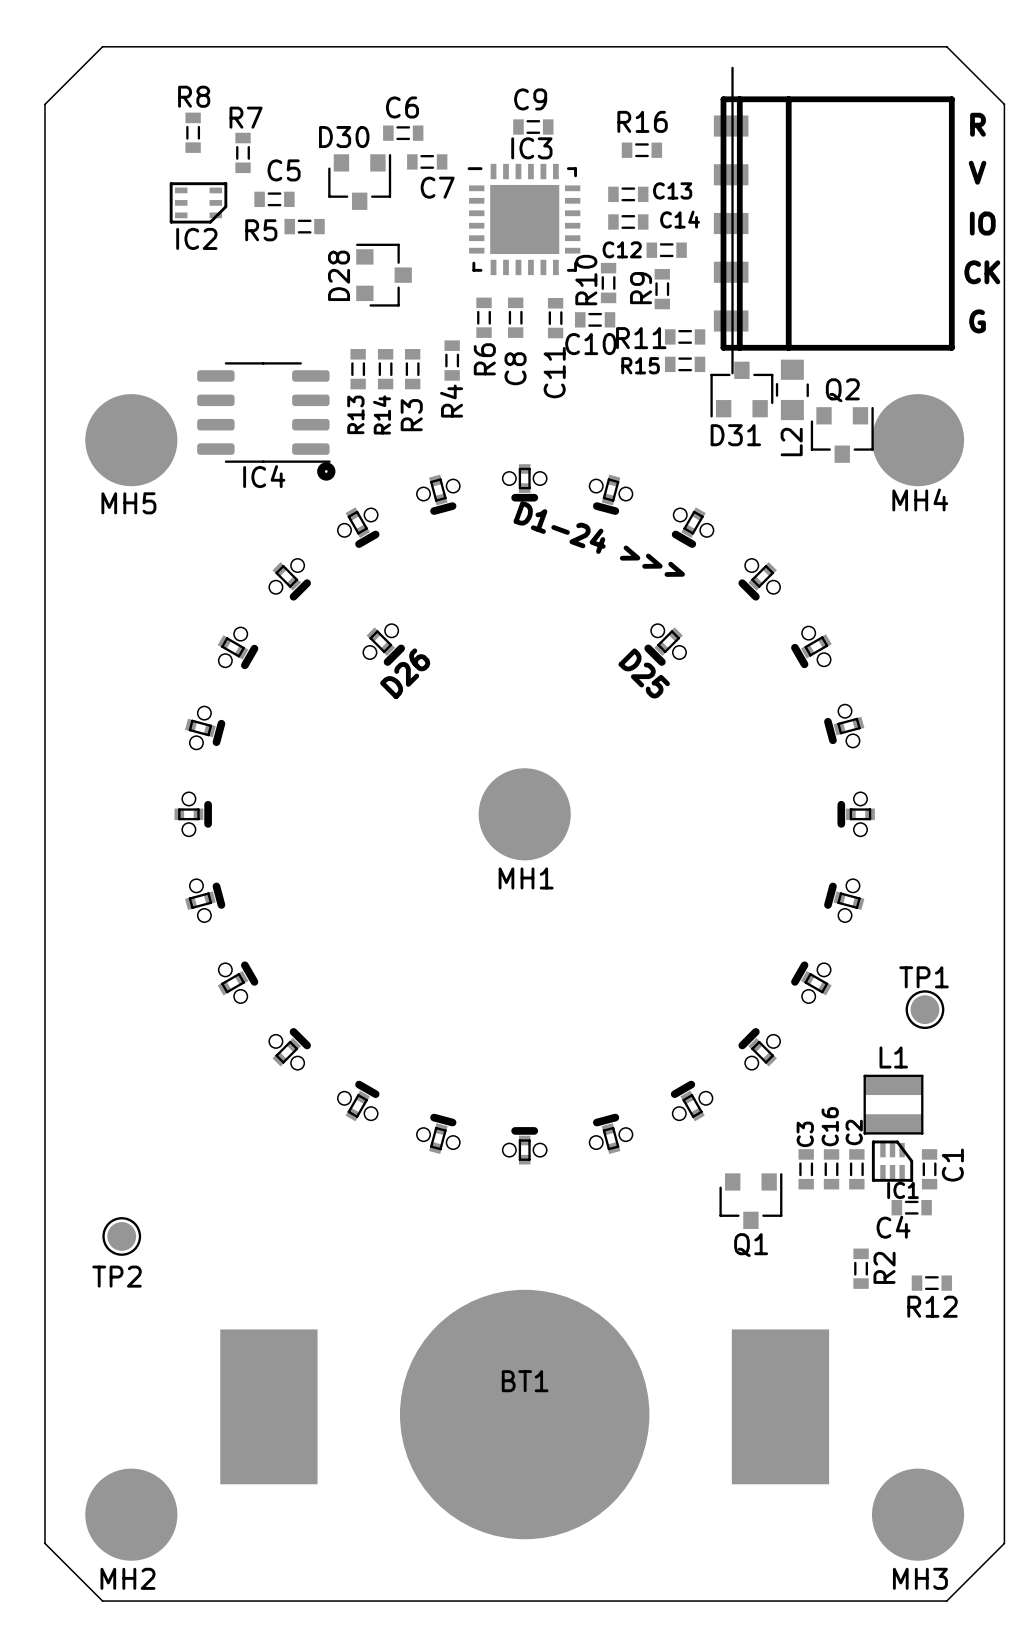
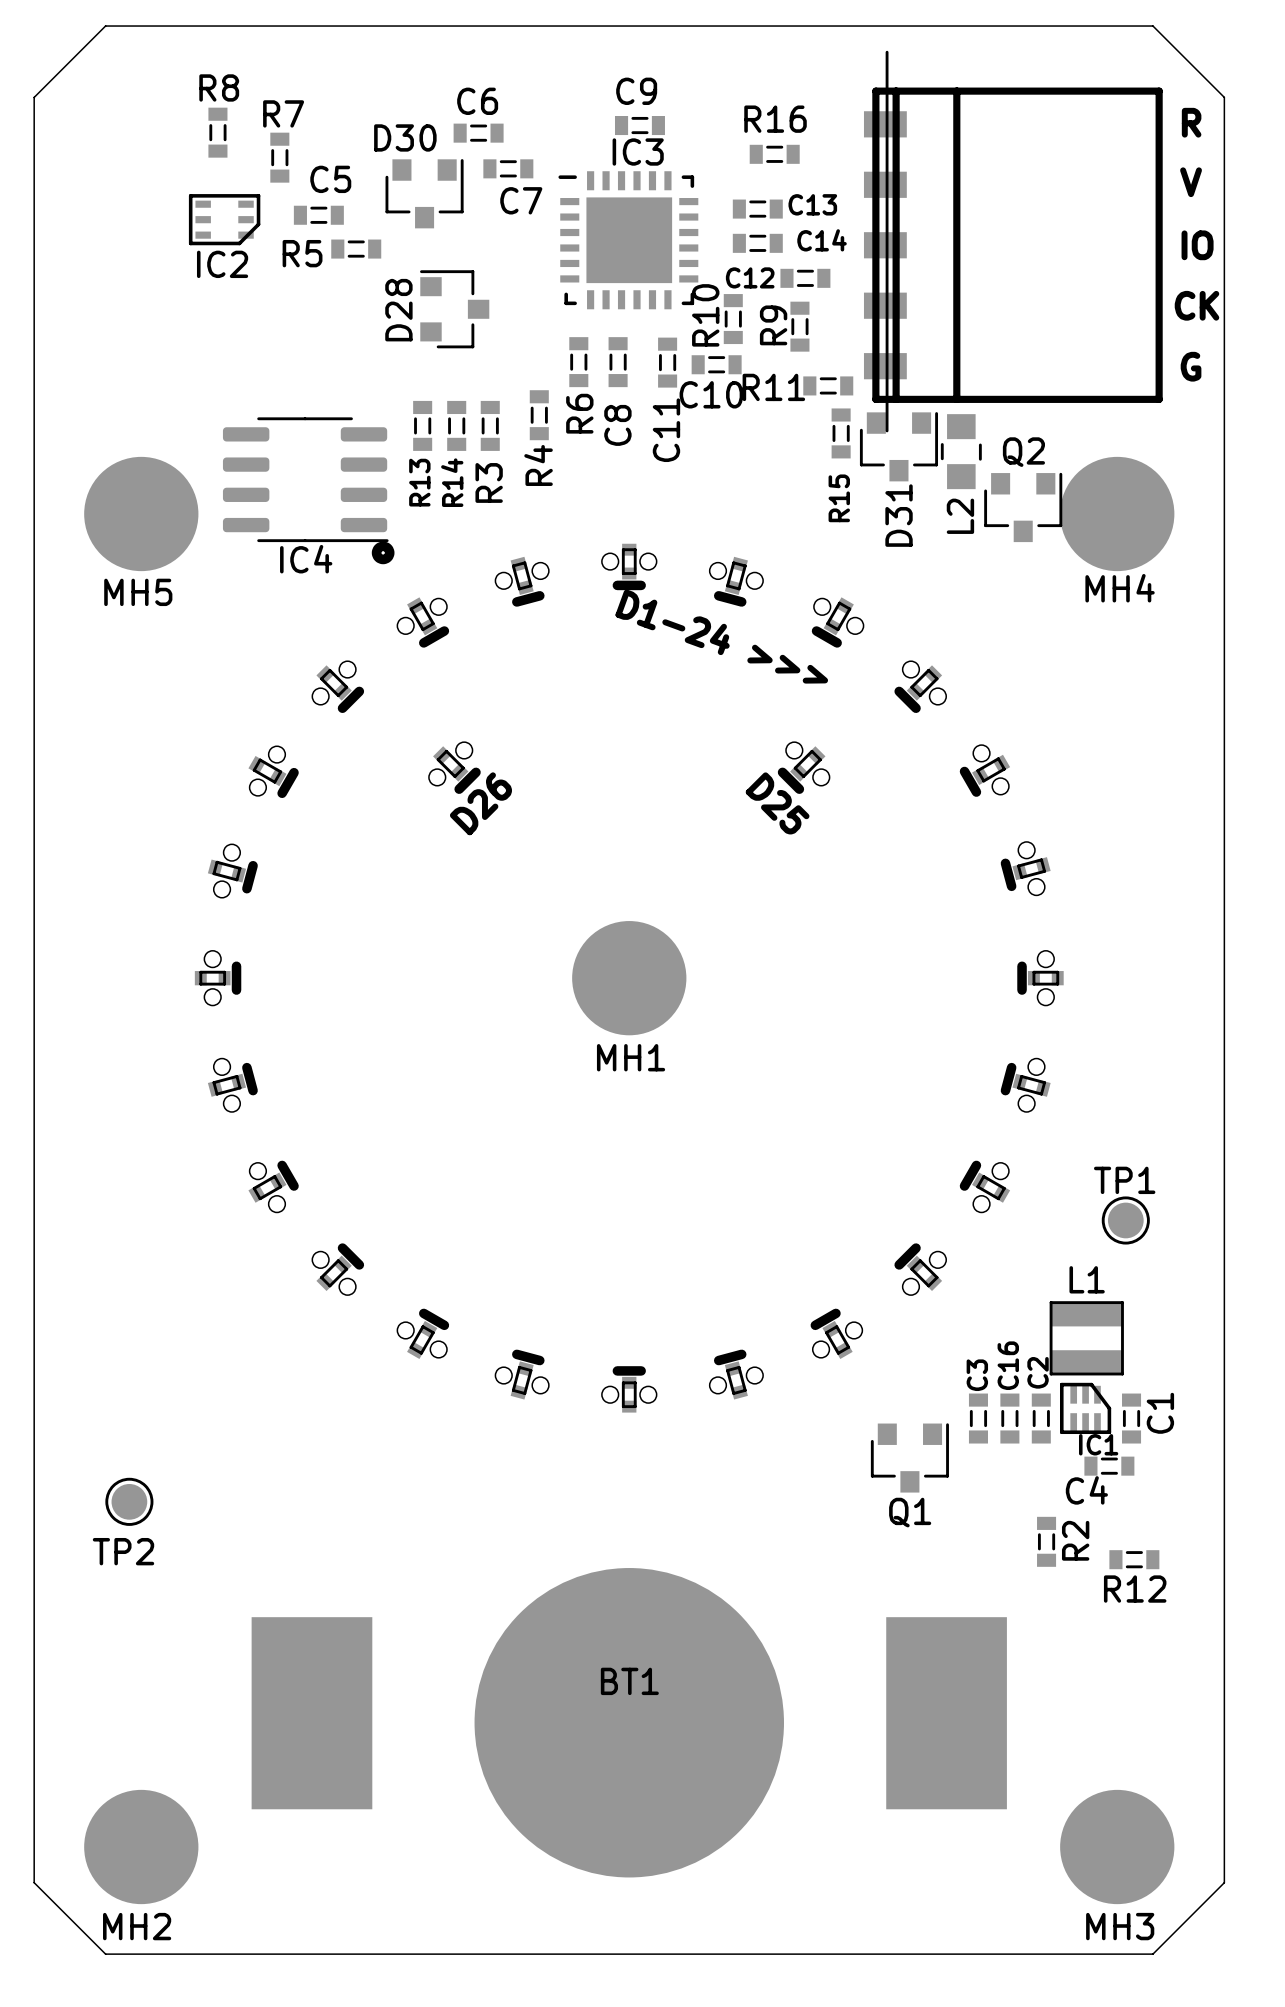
R15 rotation: 0° (685, 364) -> 90° clockwise (841, 433)
R15 name position: R15 (640, 365) -> R15 (839, 498)
D31 rotation: 0° (741, 389) -> 180° (898, 446)

